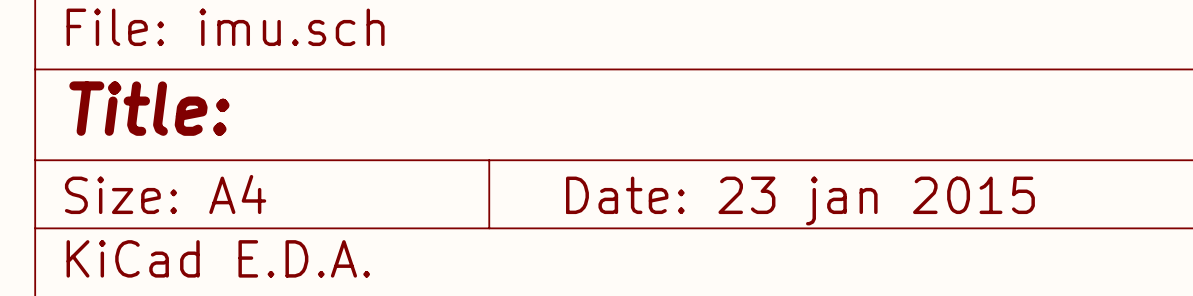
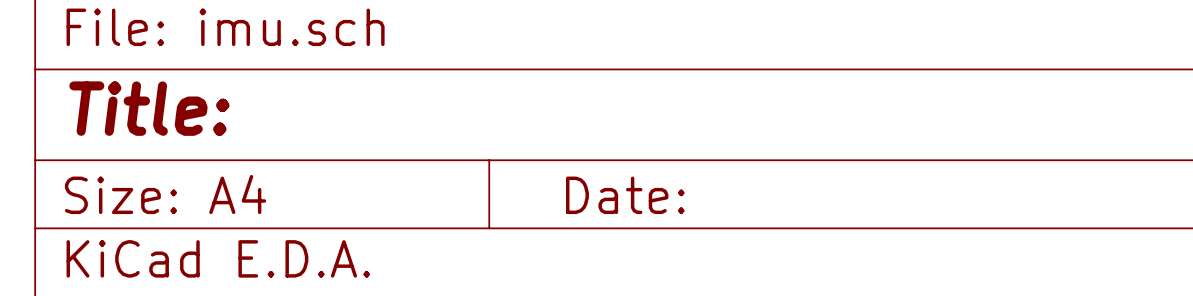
title block: Date: 23 jan 2015 (800, 200) -> Date: (625, 195)

